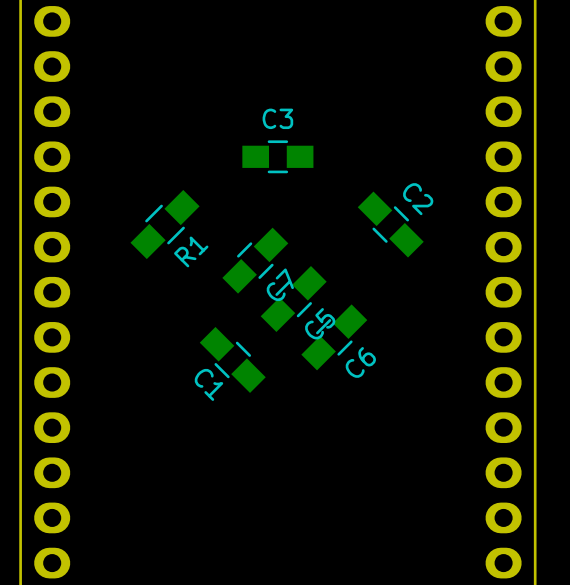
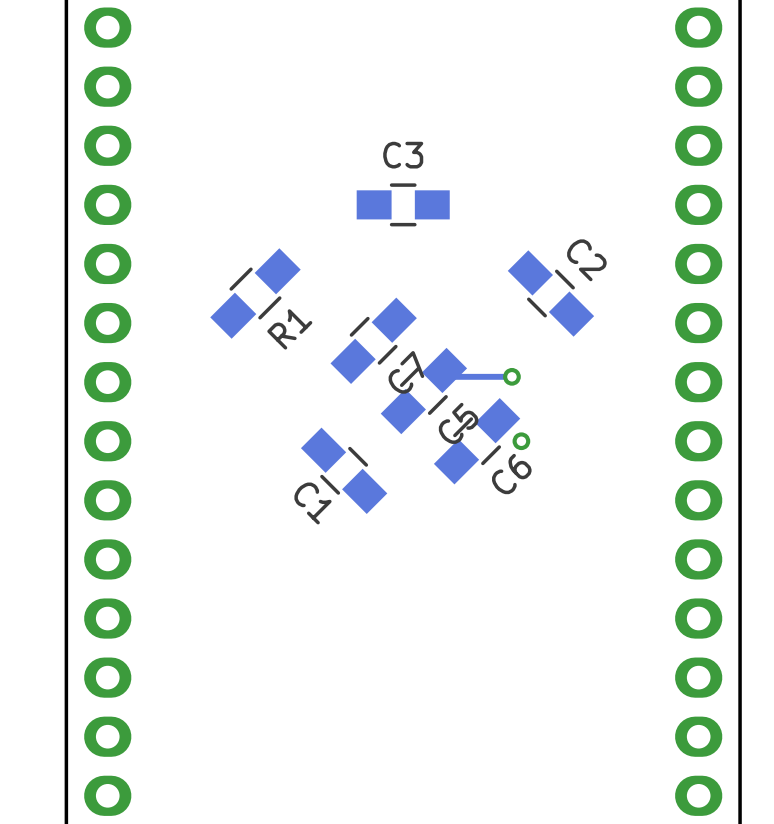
track: none -> (444, 370) (450, 376) (511, 376)
via: none -> (511, 376)
via: none -> (521, 441)

